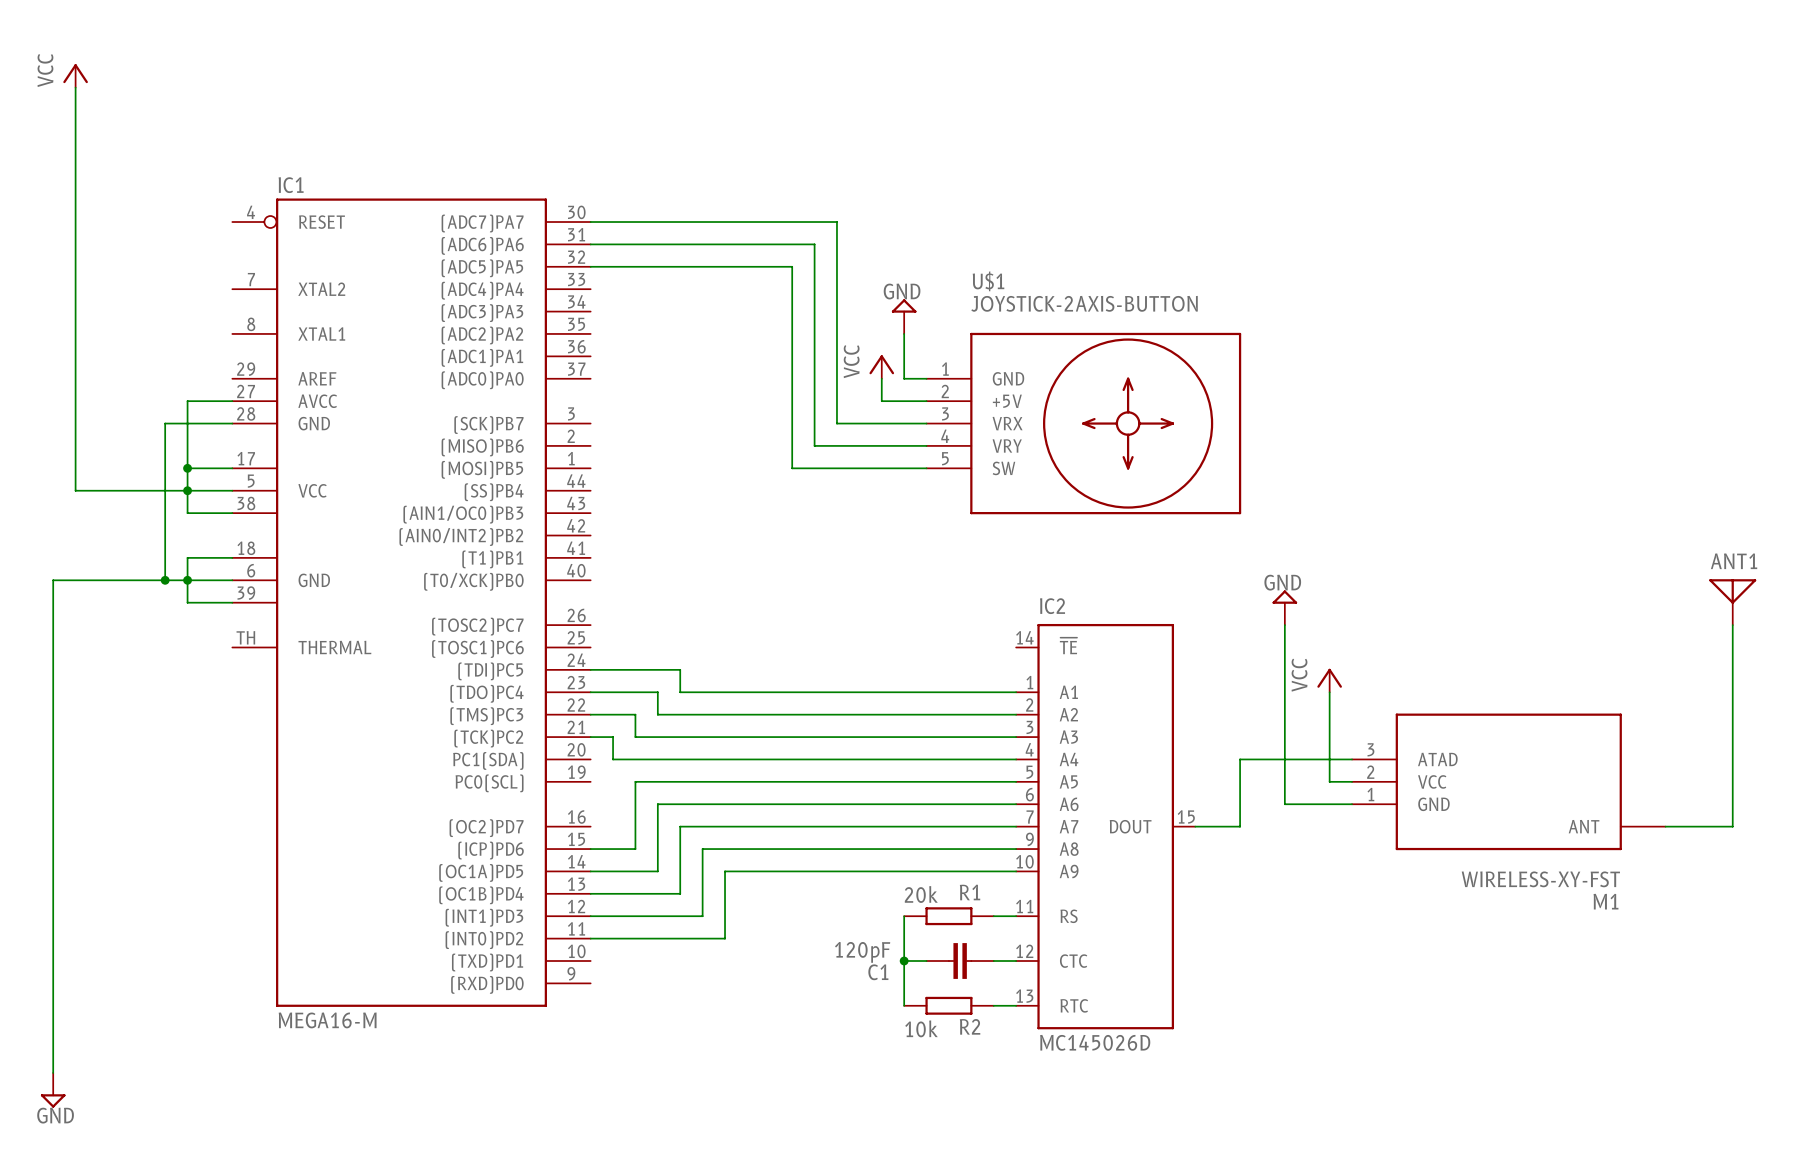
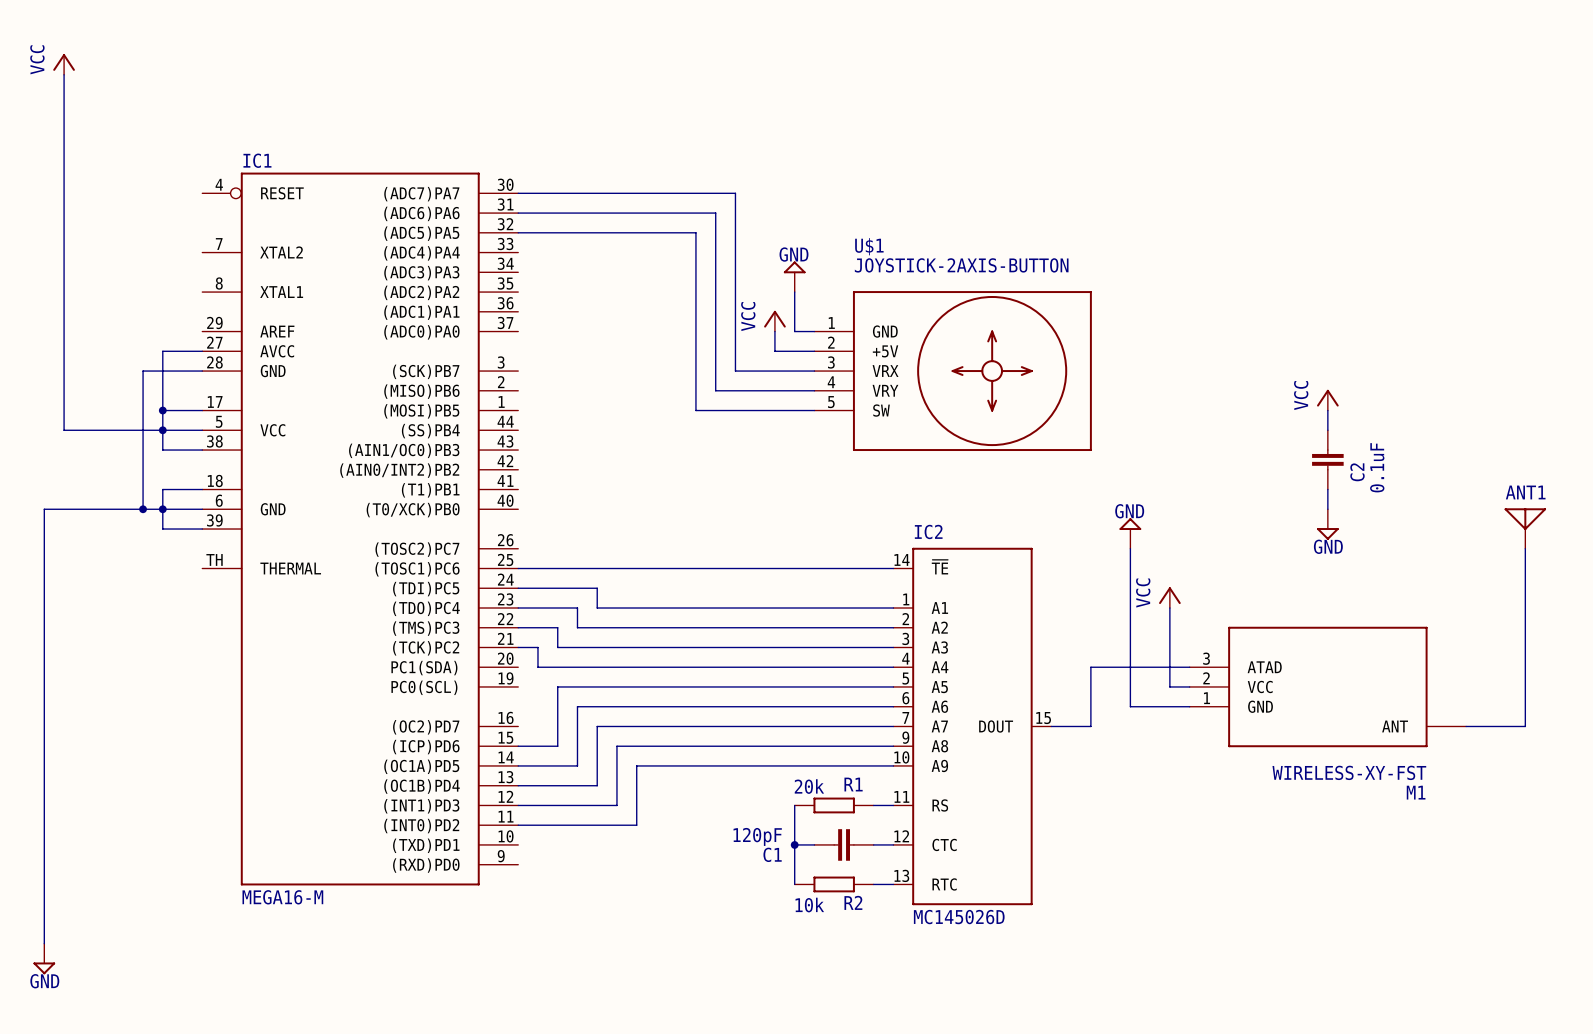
power symbol: none -> VCC (1327, 400)
wire: none -> (1327, 410) (1327, 430)
C2: none -> 0.1uF (1327, 459)
wire: none -> (1327, 489) (1327, 509)
power symbol: none -> GND (1327, 524)
wire: none -> (518, 568) (893, 568)

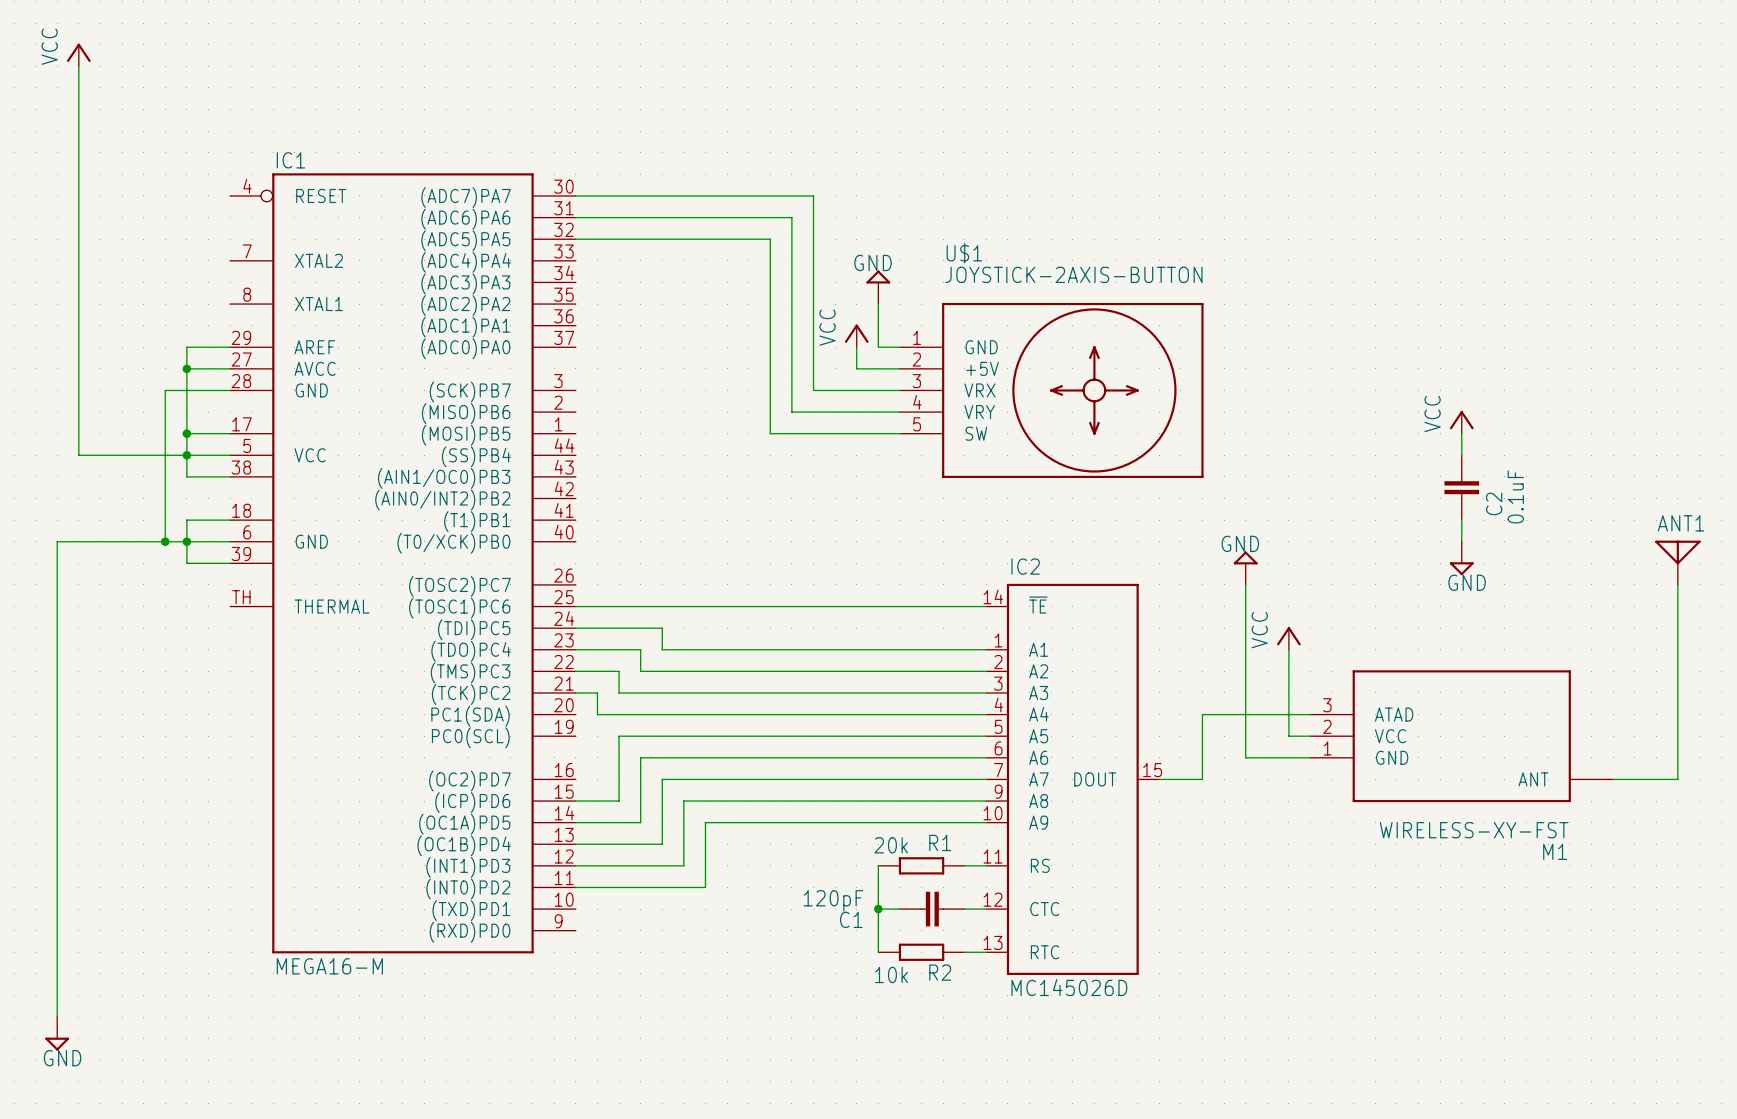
wire: none -> (230, 347) (186, 347) (186, 368)
junction: none -> (186, 368)

